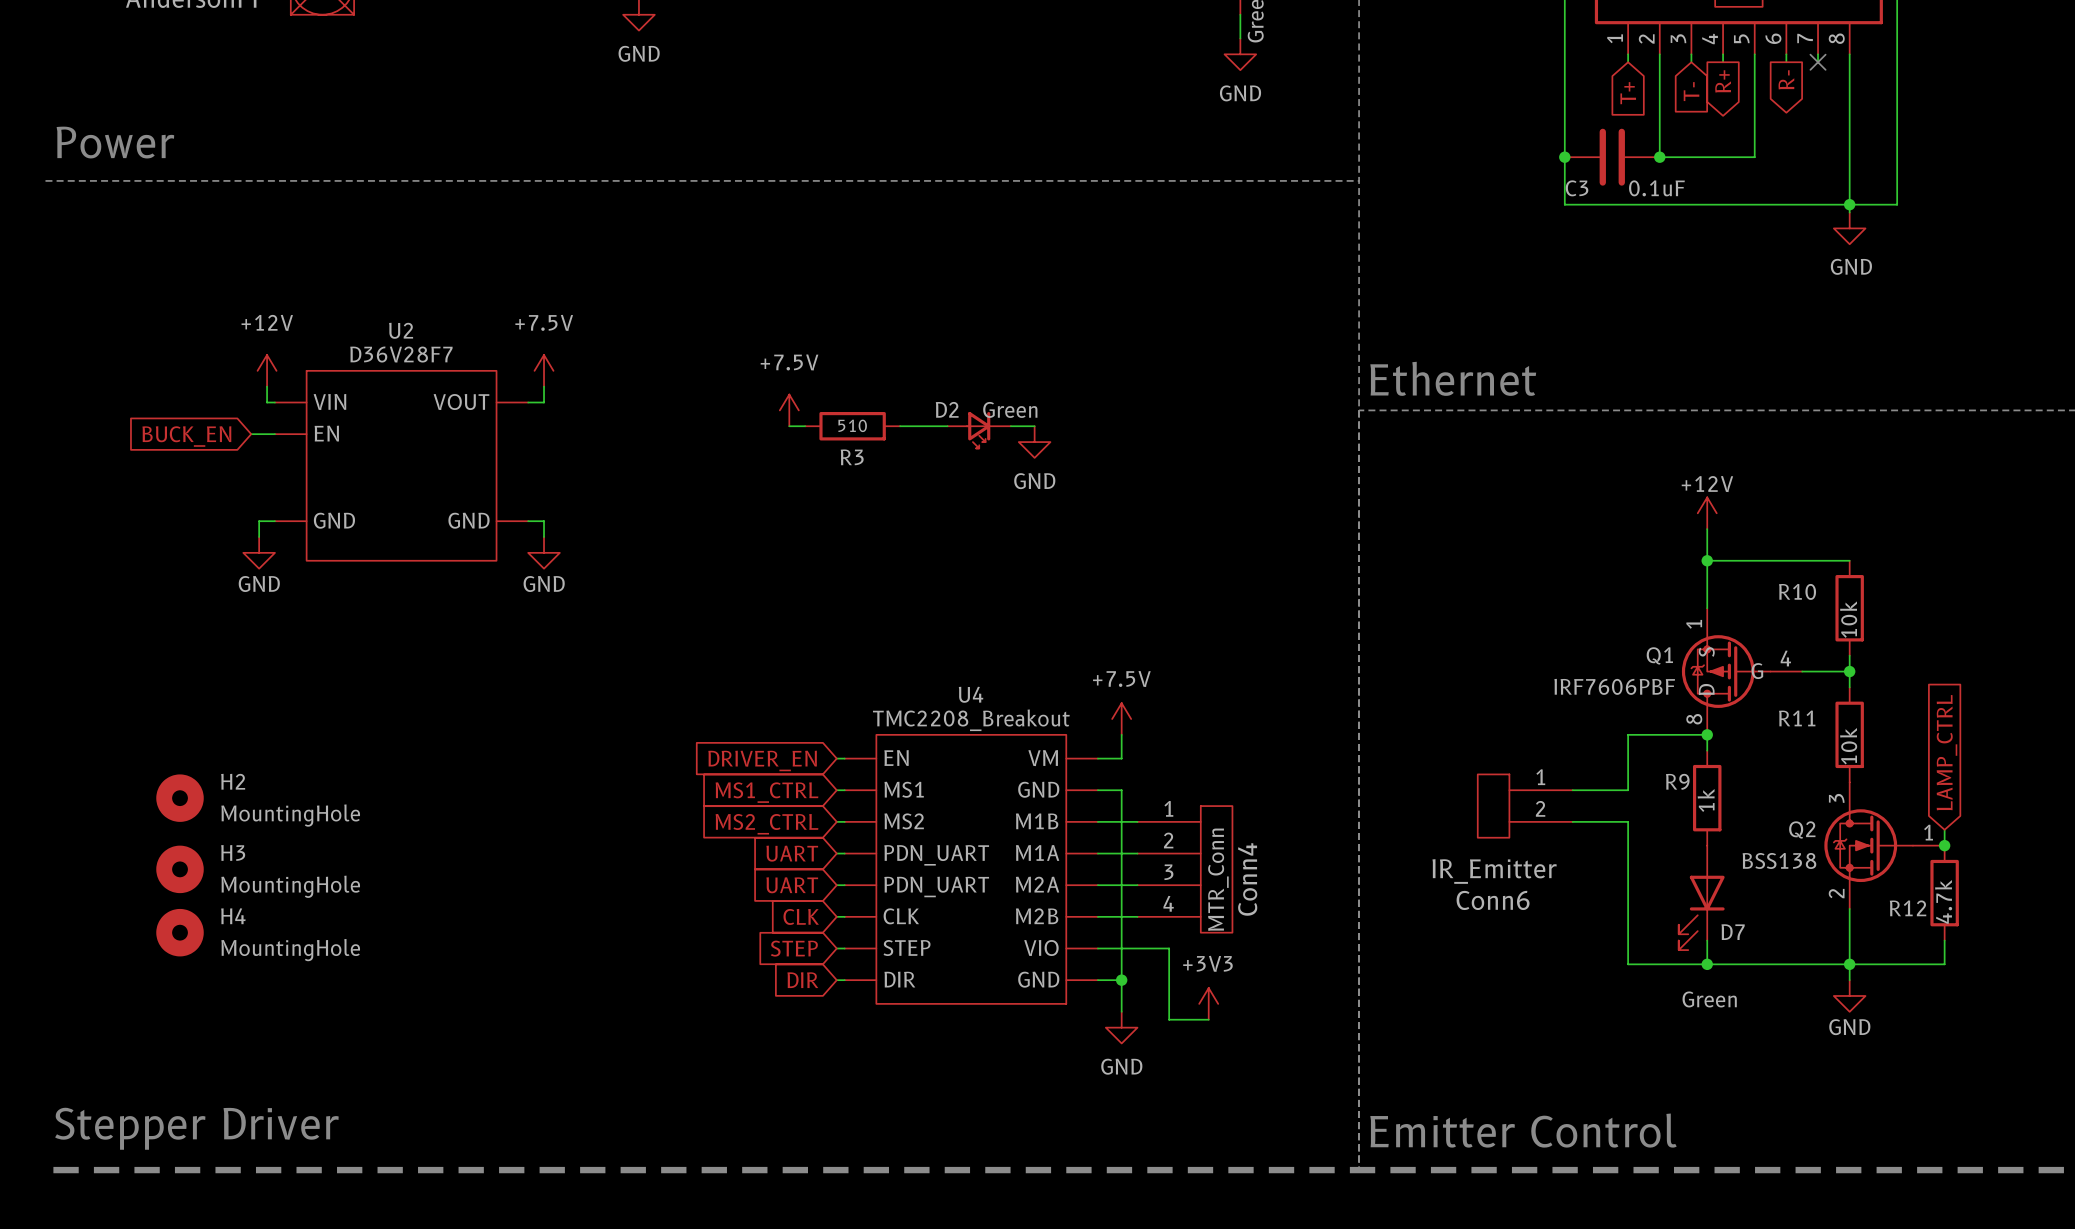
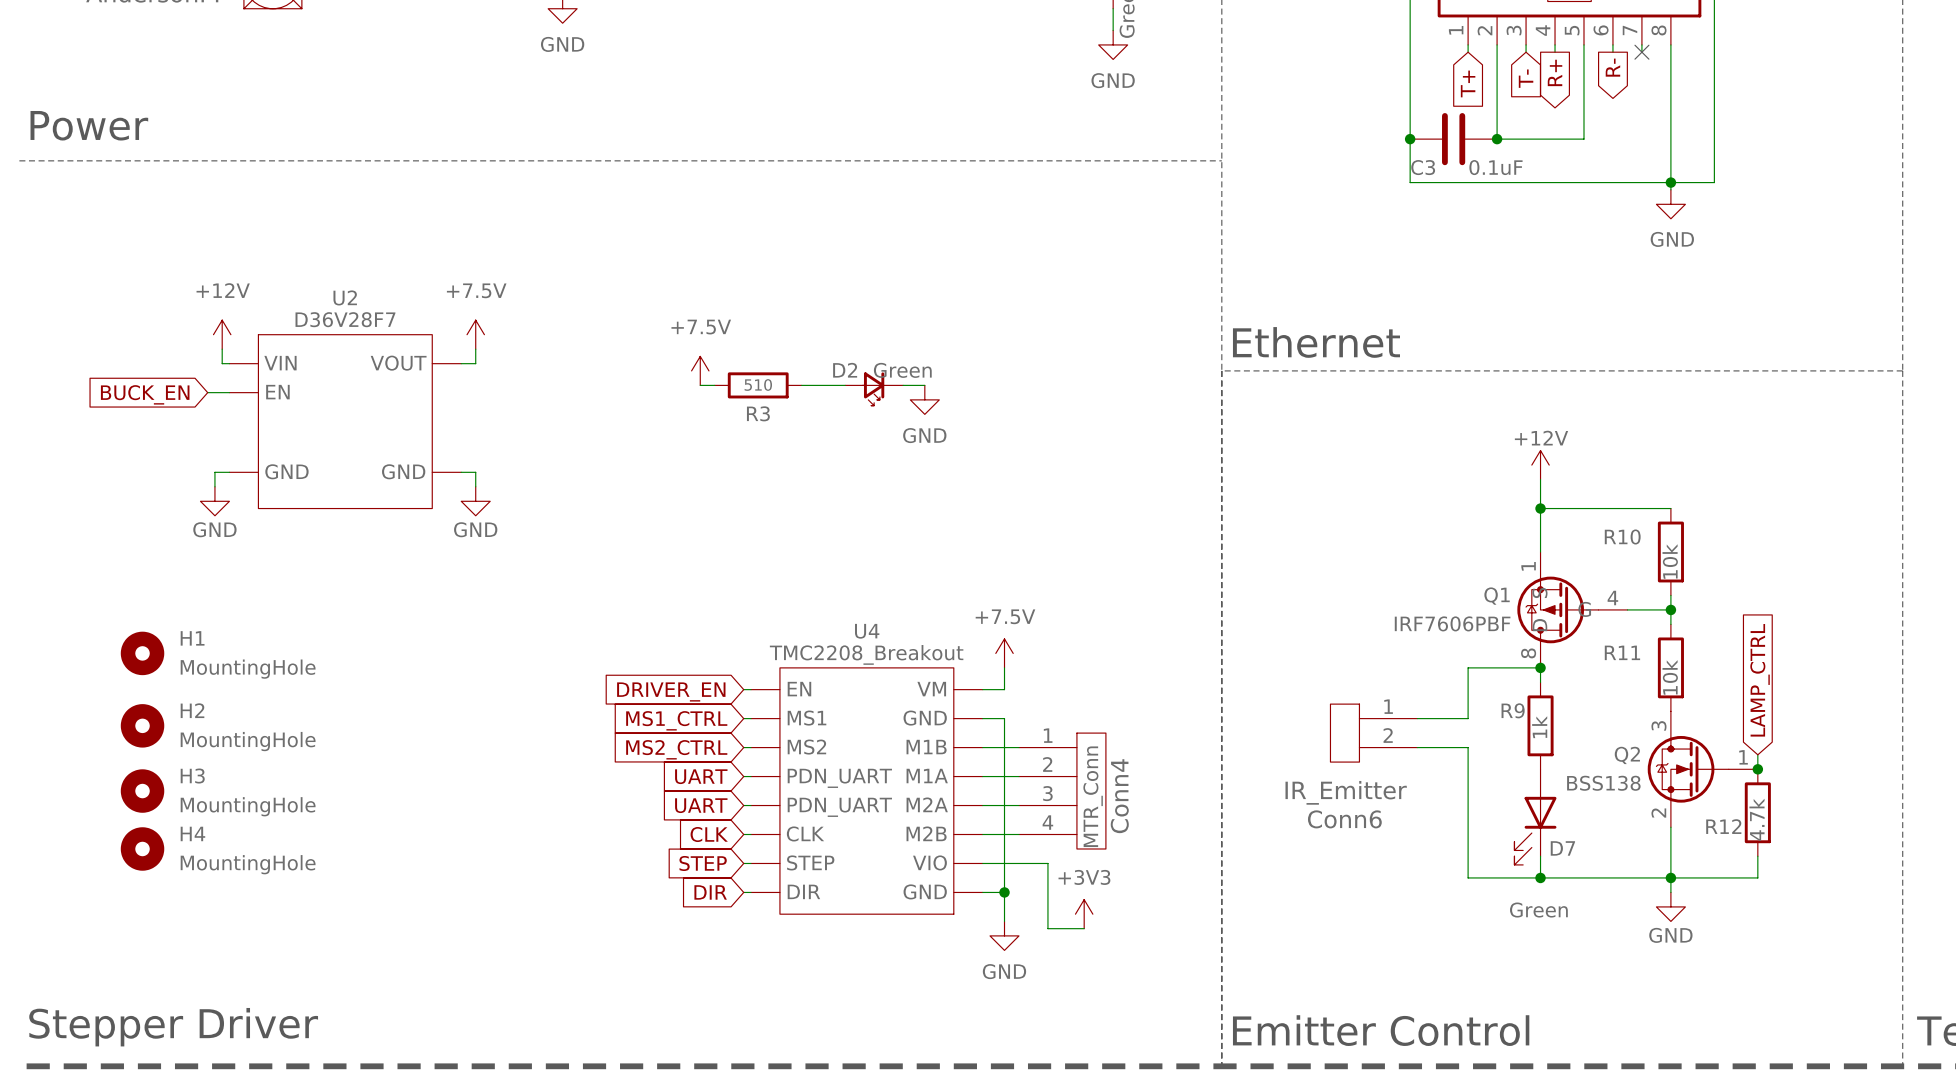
H1: none -> MountingHole (142, 653)

